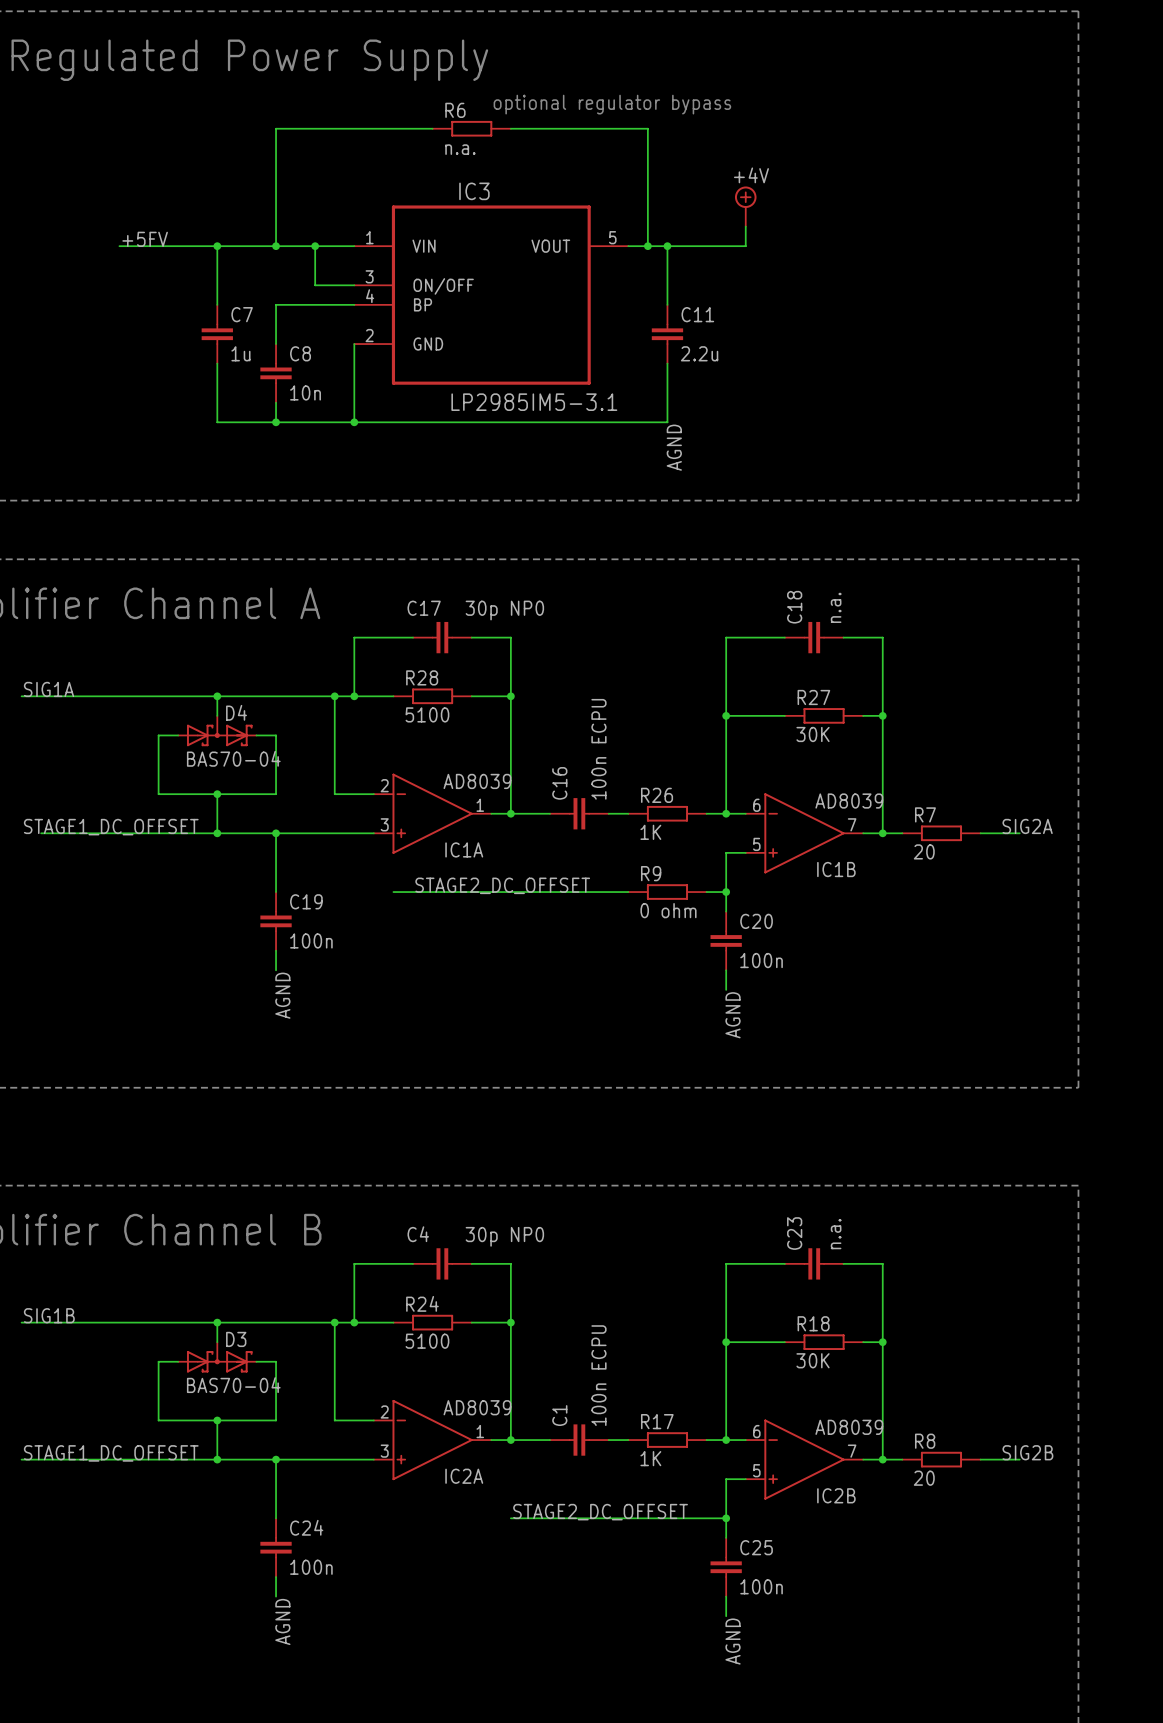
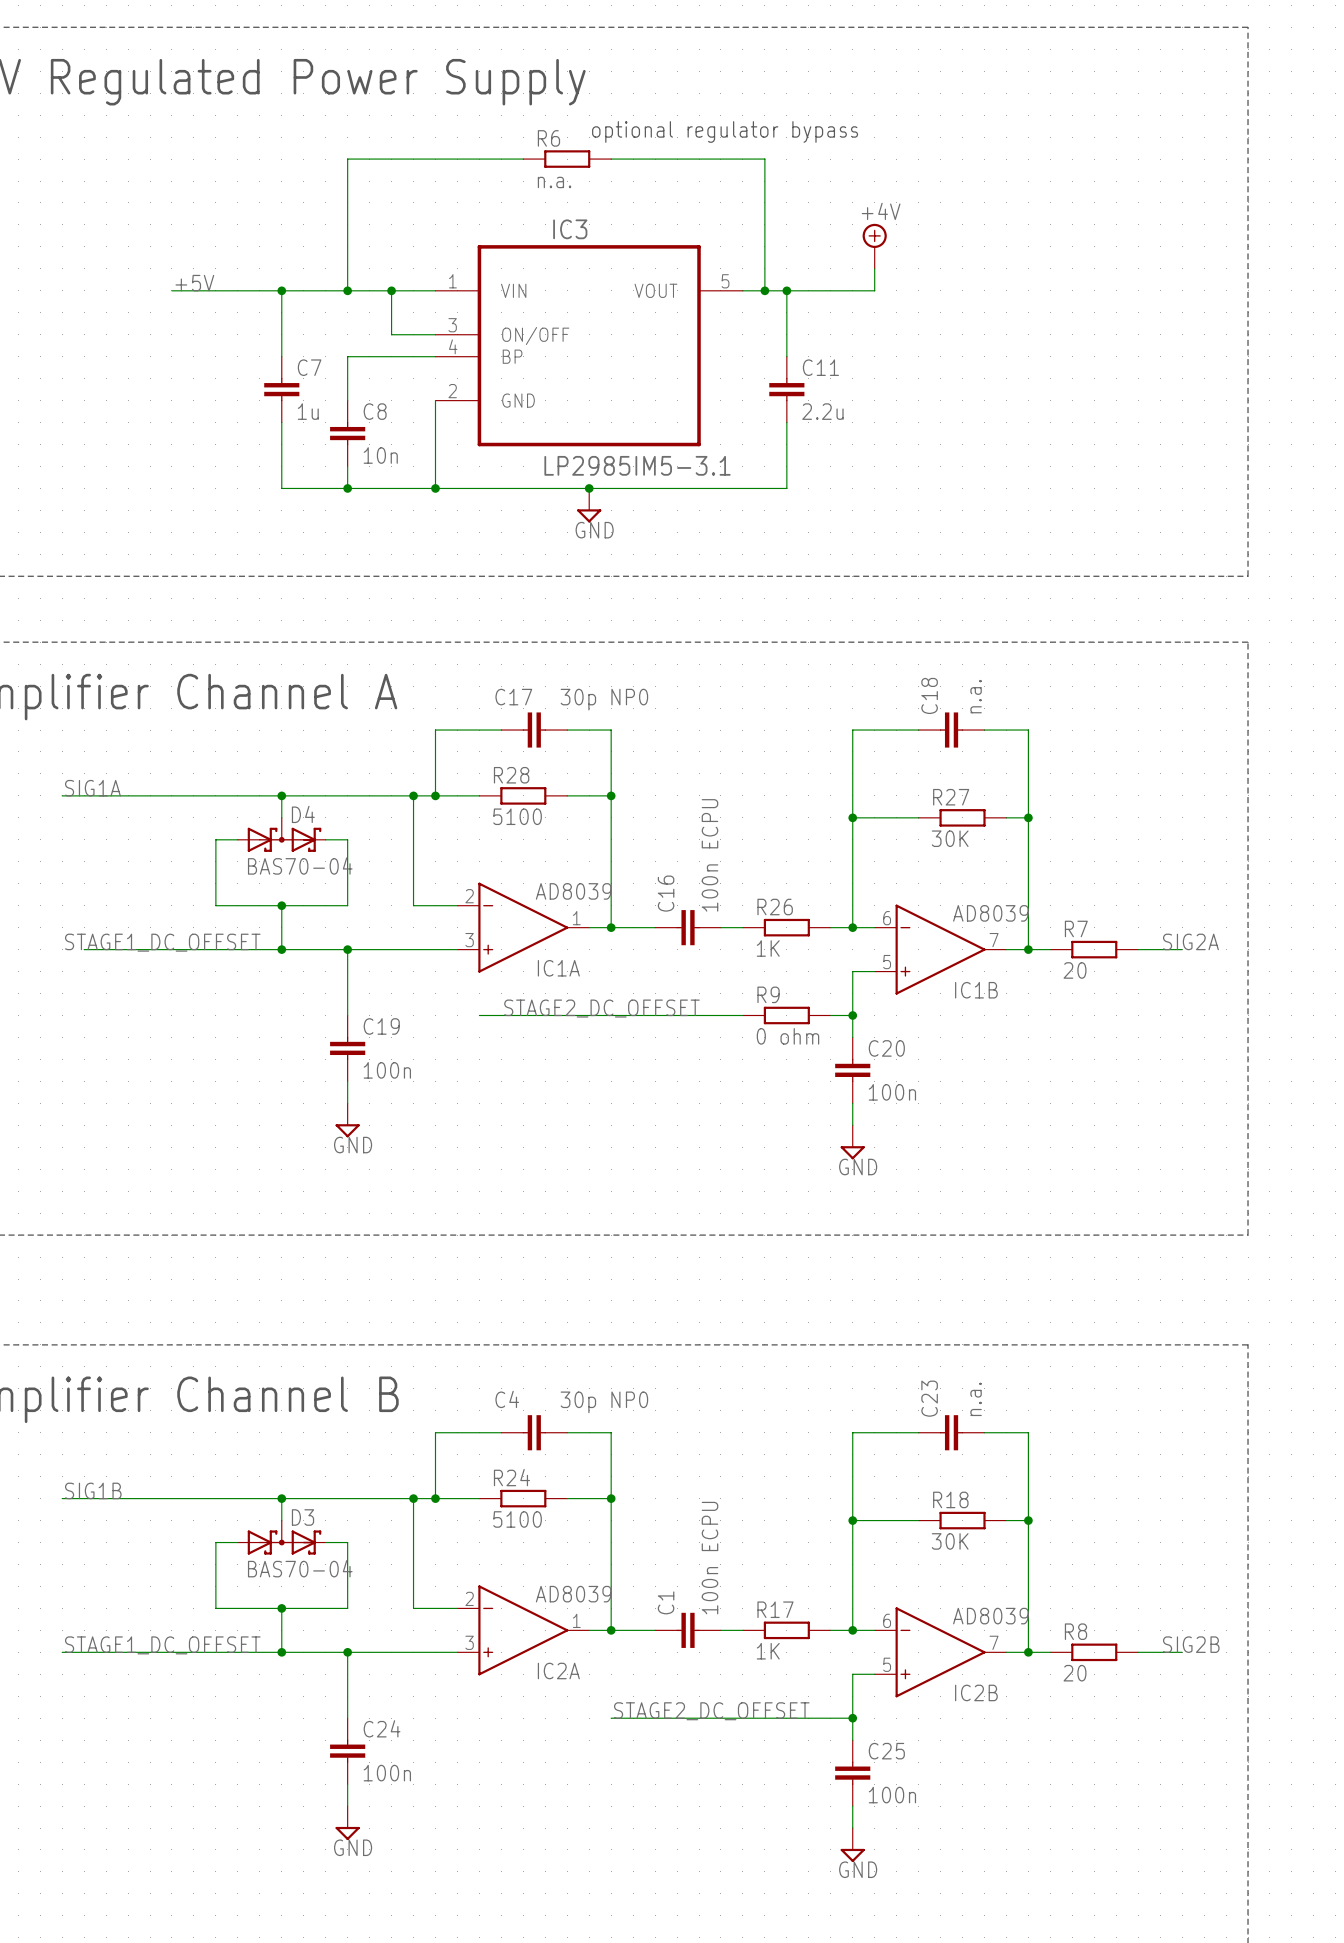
label: +5FV (145, 239) -> +5V (194, 283)
junction: none -> (589, 488)
power symbol: none -> GND (589, 505)
label: AGND (674, 447) -> none
power symbol: none -> GND (347, 1120)
label: AGND (282, 995) -> none
power symbol: none -> GND (852, 1142)
label: AGND (733, 1015) -> none
power symbol: none -> GND (347, 1823)
label: AGND (282, 1621) -> none
power symbol: none -> GND (852, 1845)
label: AGND (733, 1641) -> none

